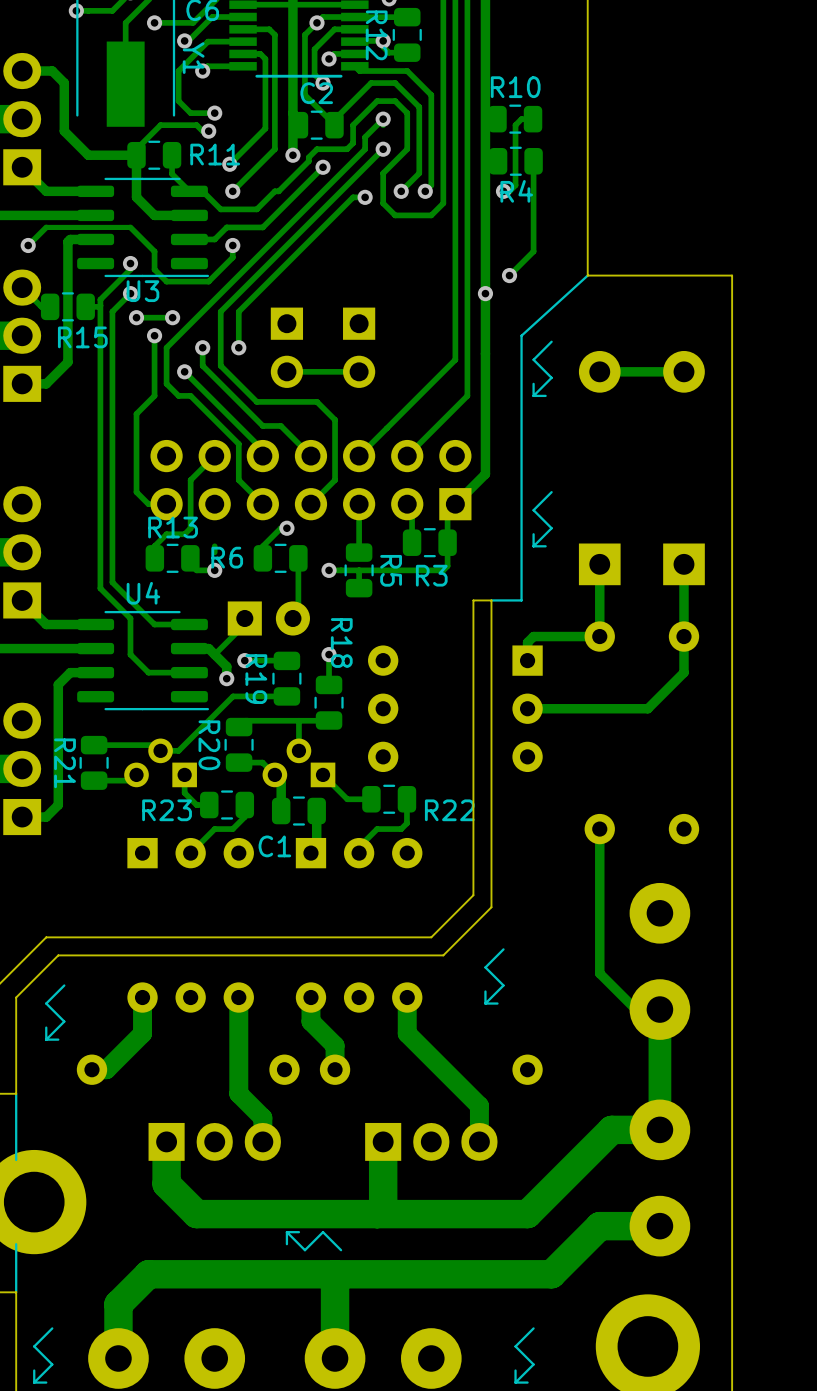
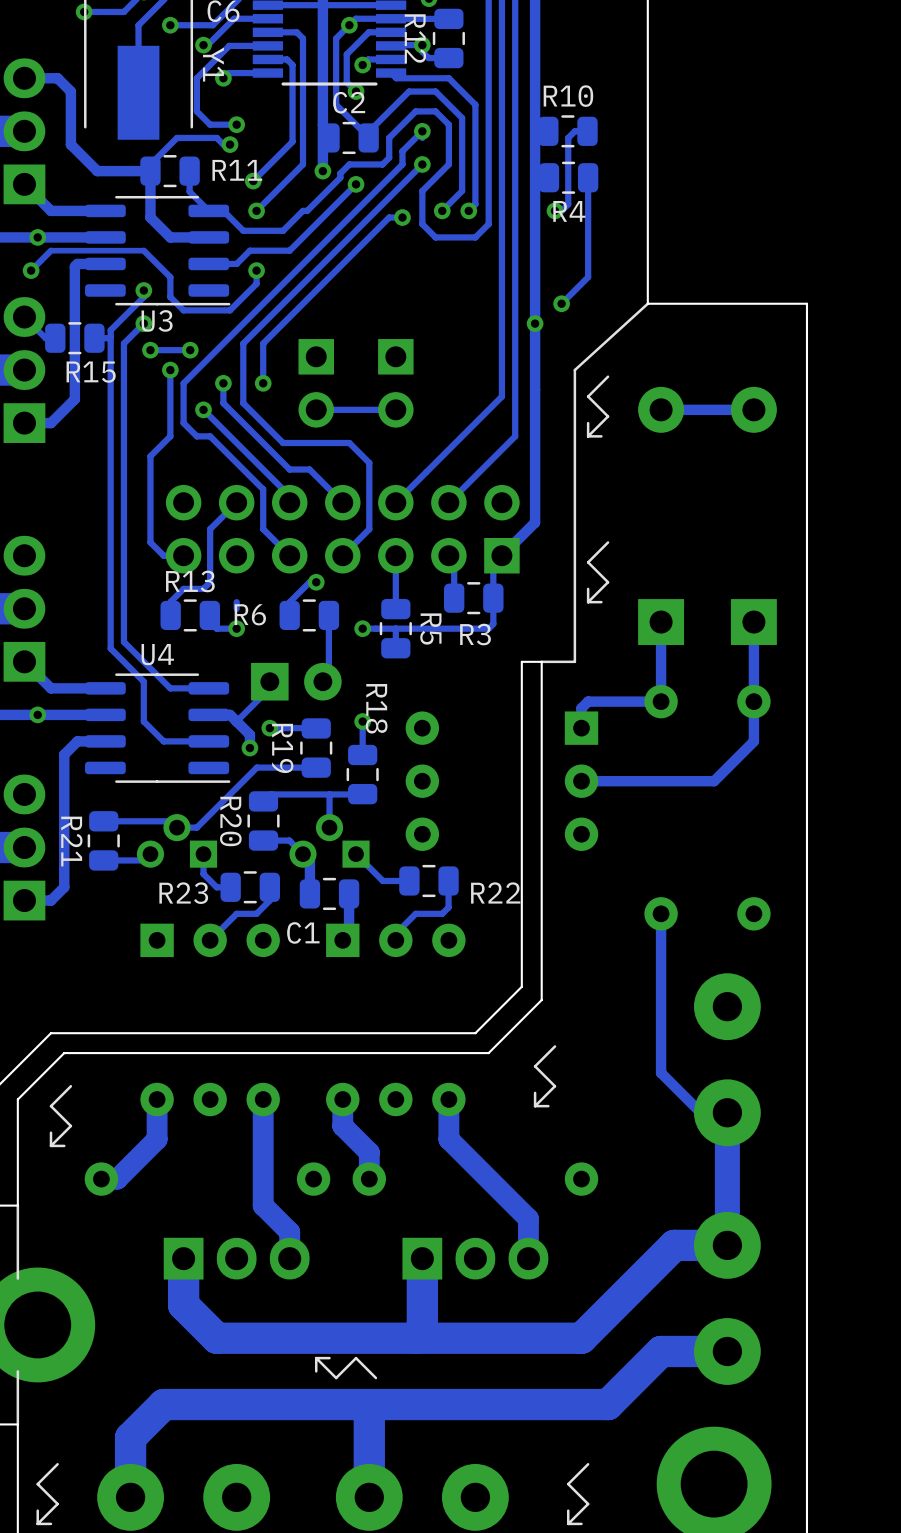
via: none -> (37, 237)
via: none -> (37, 714)

